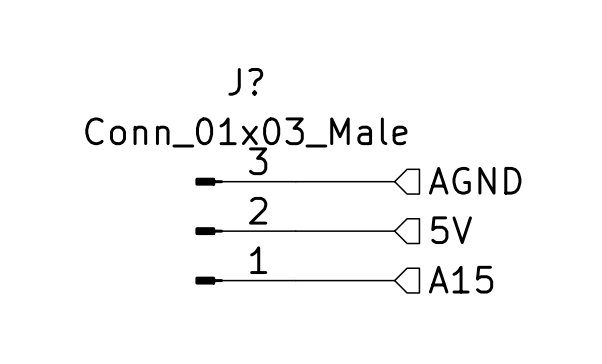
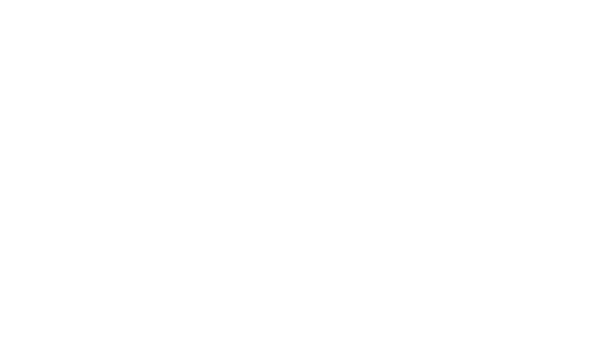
hierarchical label: AGND (475, 180) -> none
wire: (295, 181) (394, 181) -> none
hierarchical label: 5V (451, 230) -> none
J?: Conn_01x03_Male (245, 231) -> none
wire: (295, 231) (394, 231) -> none
hierarchical label: A15 (461, 279) -> none
wire: (295, 280) (394, 280) -> none

